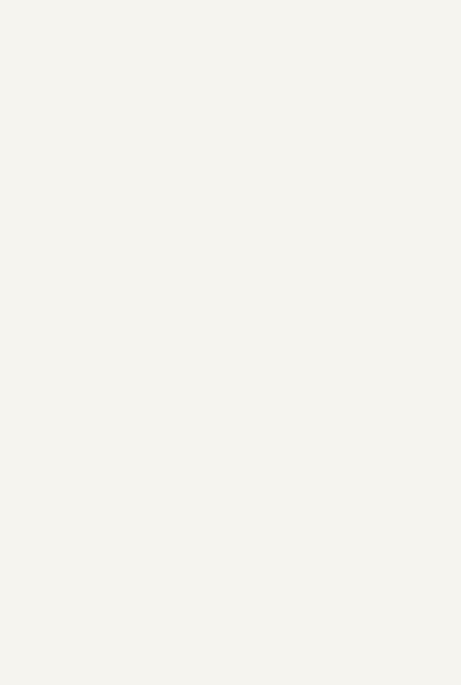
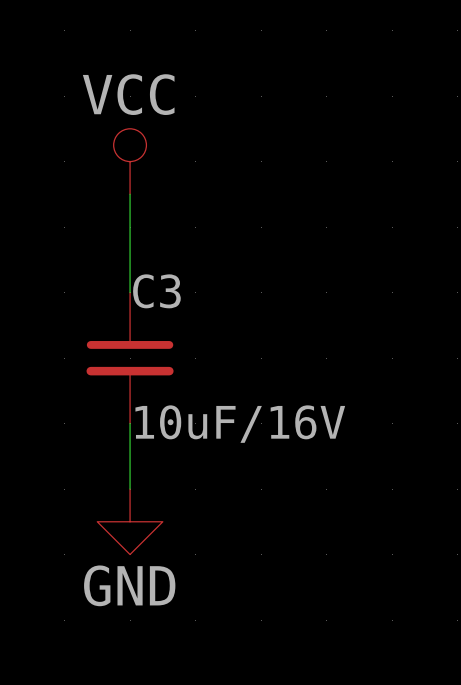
power symbol: none -> VCC (130, 161)
wire: none -> (130, 194) (130, 292)
C3: none -> 10uF/16V (130, 358)
wire: none -> (130, 423) (130, 489)
power symbol: none -> GND (130, 521)

